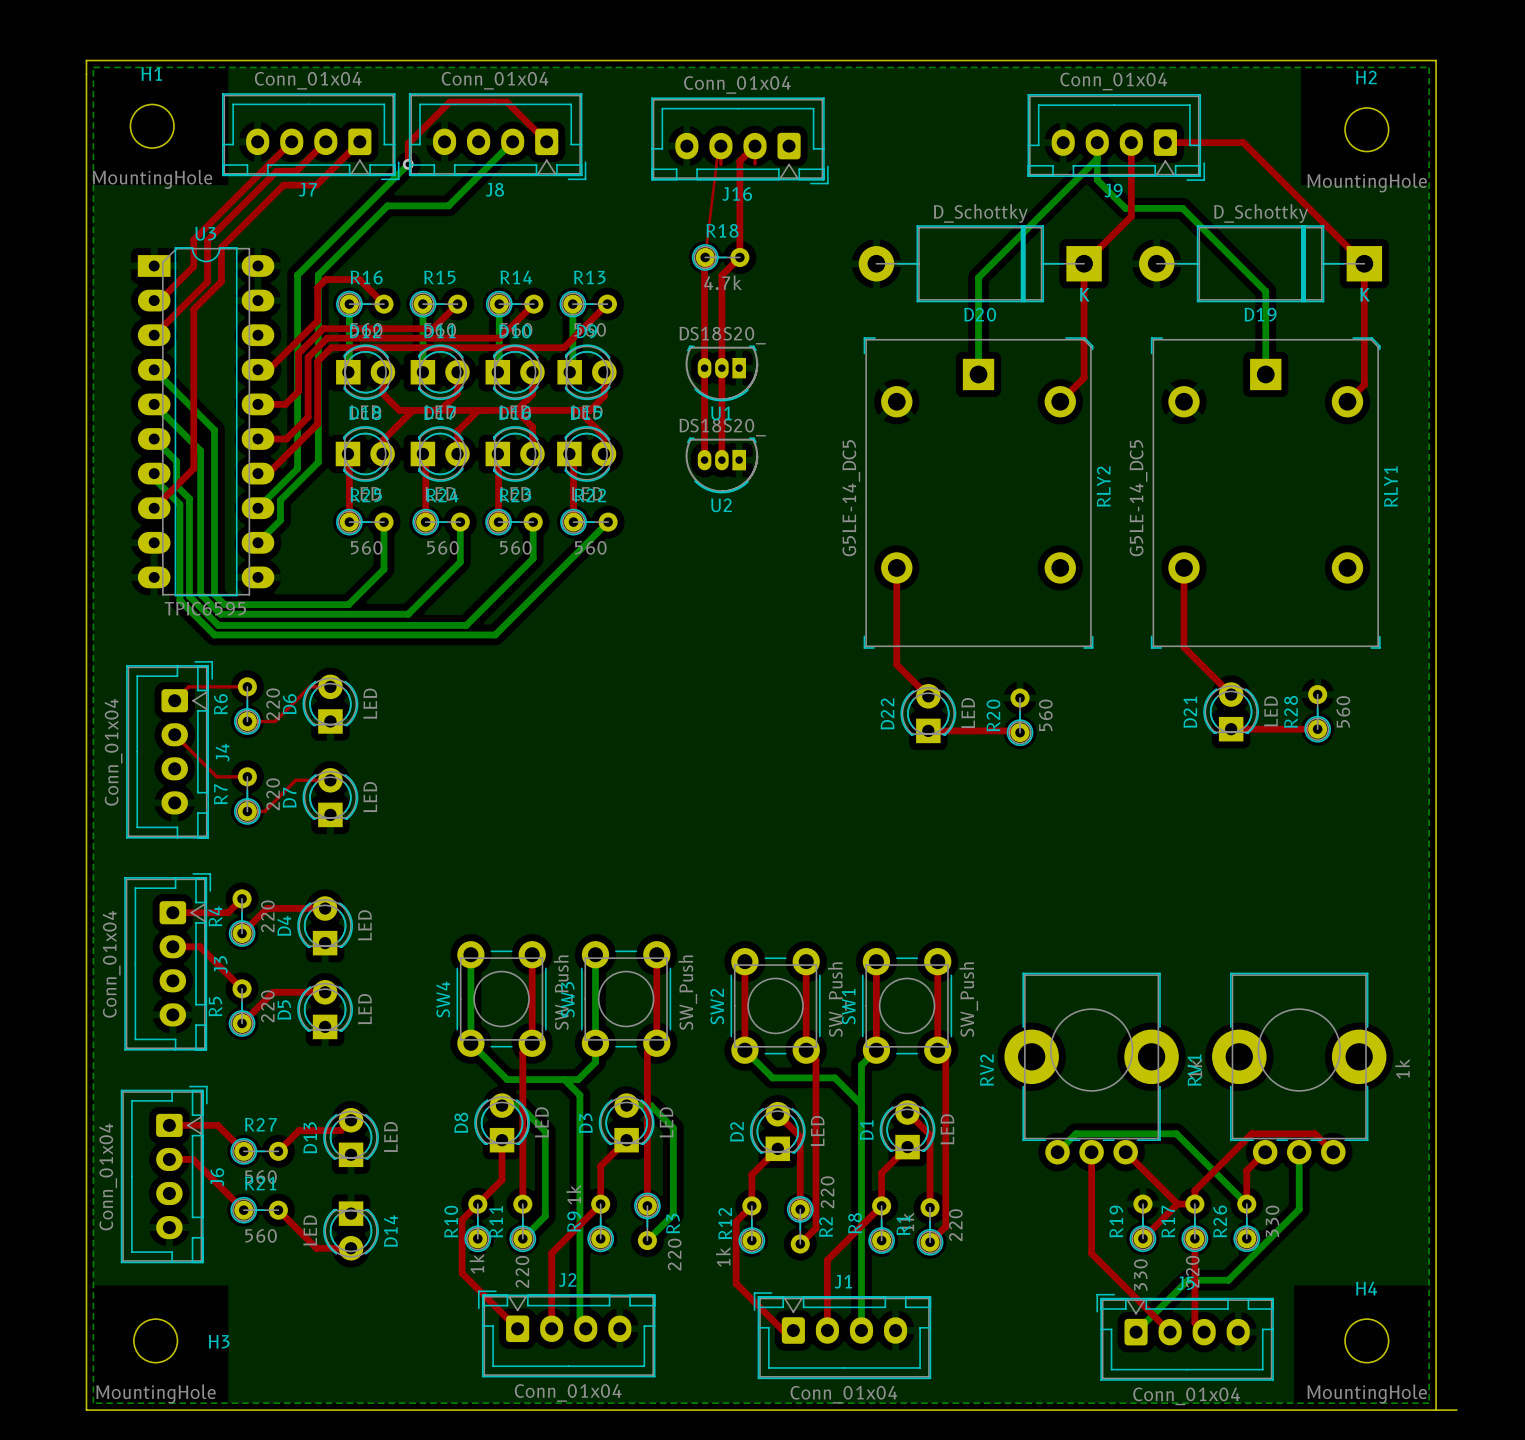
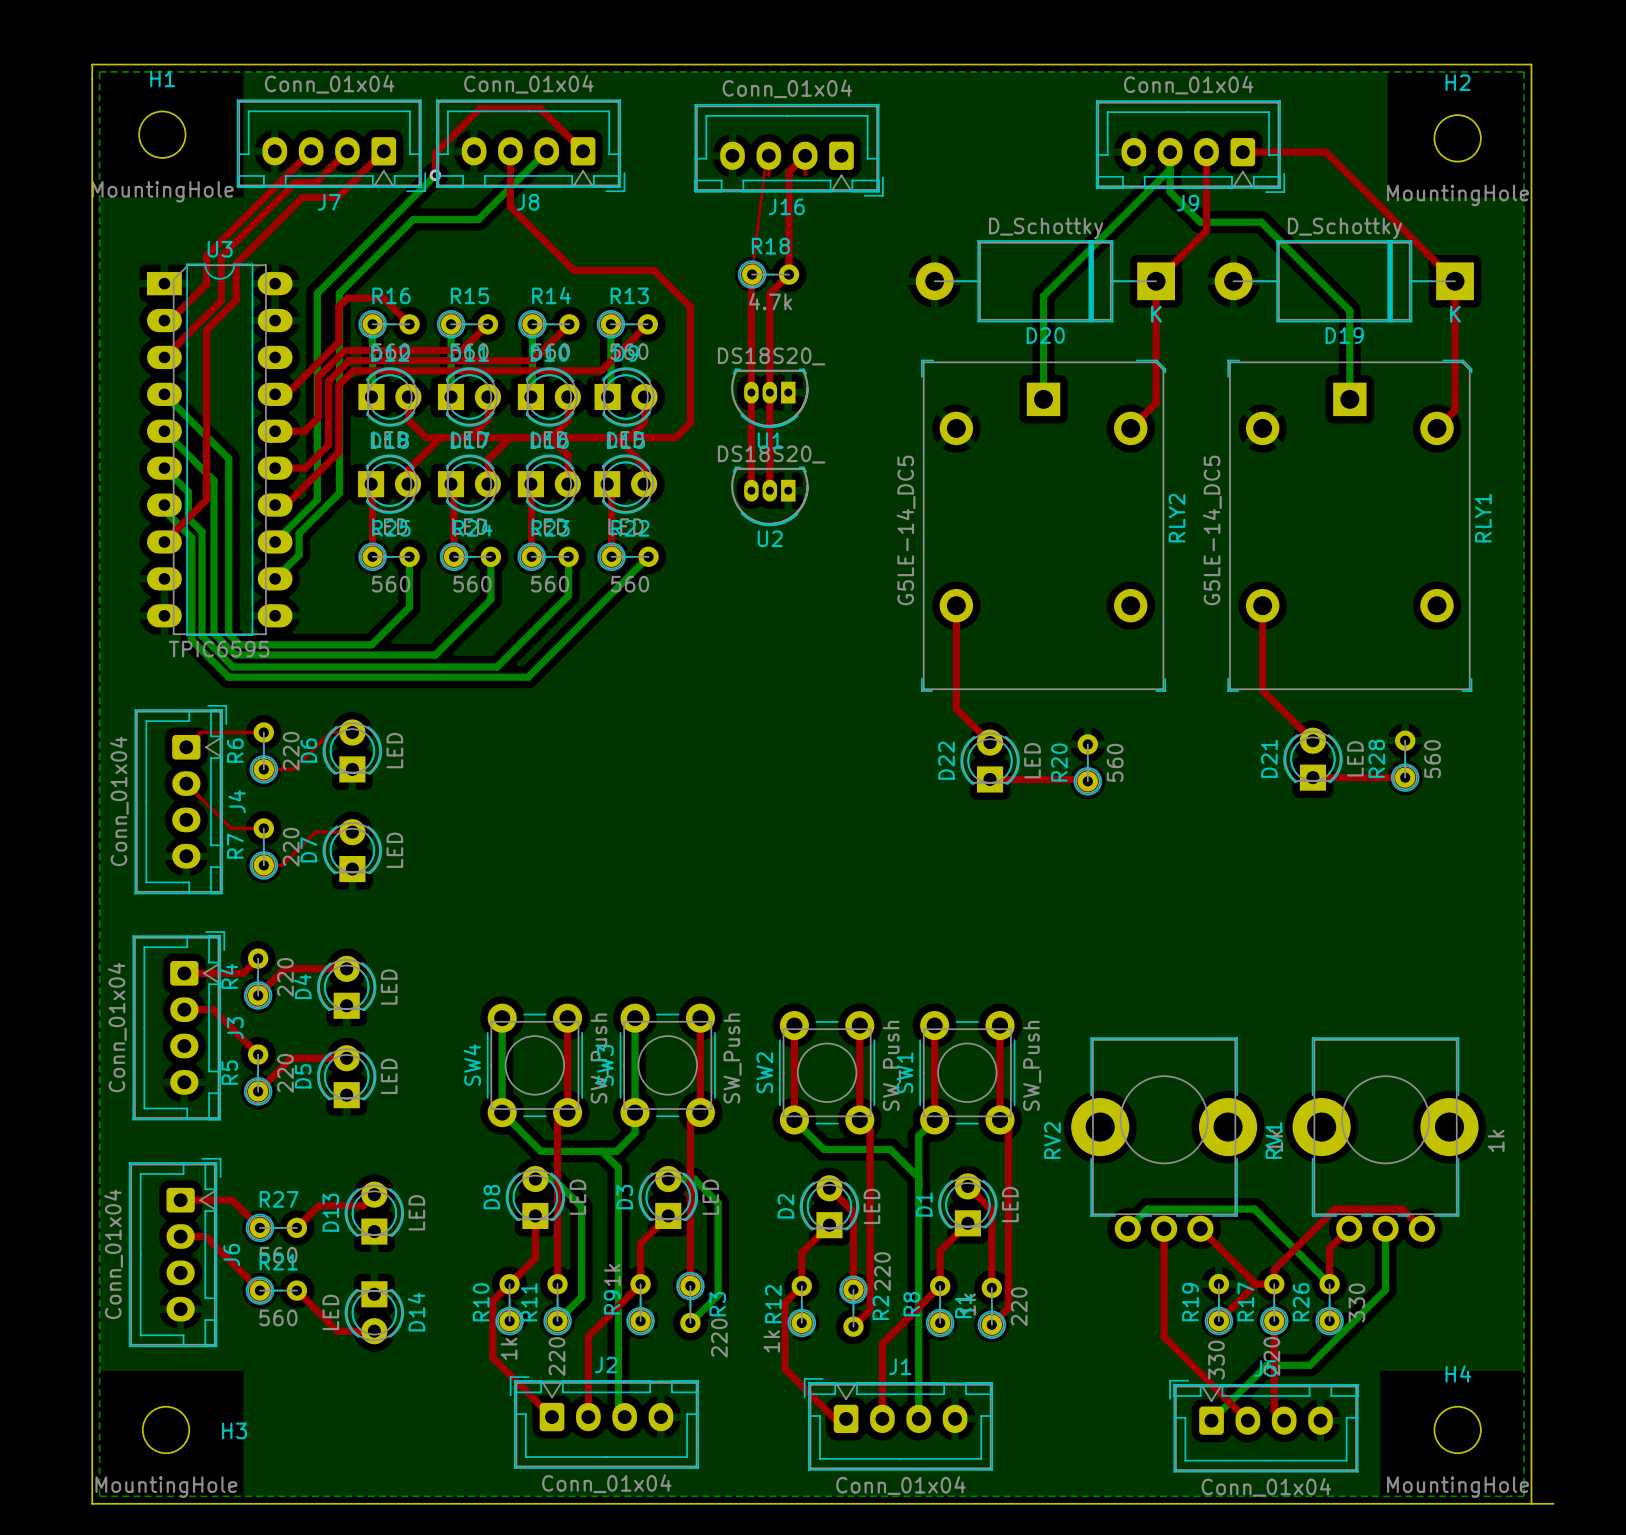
top track: none -> (510, 151) (510, 206) (574, 270) (654, 270) (690, 306) (690, 423) (675, 437) (629, 437)

